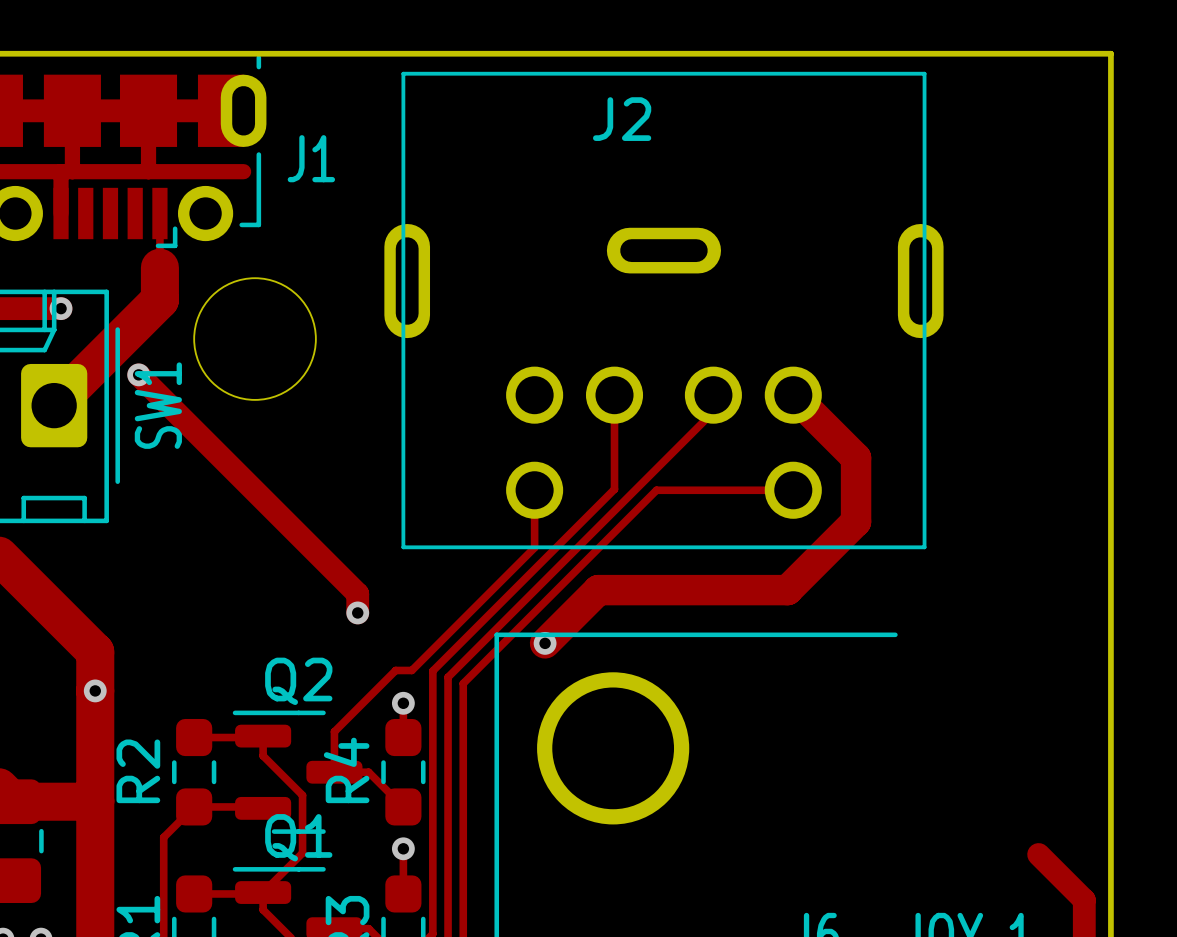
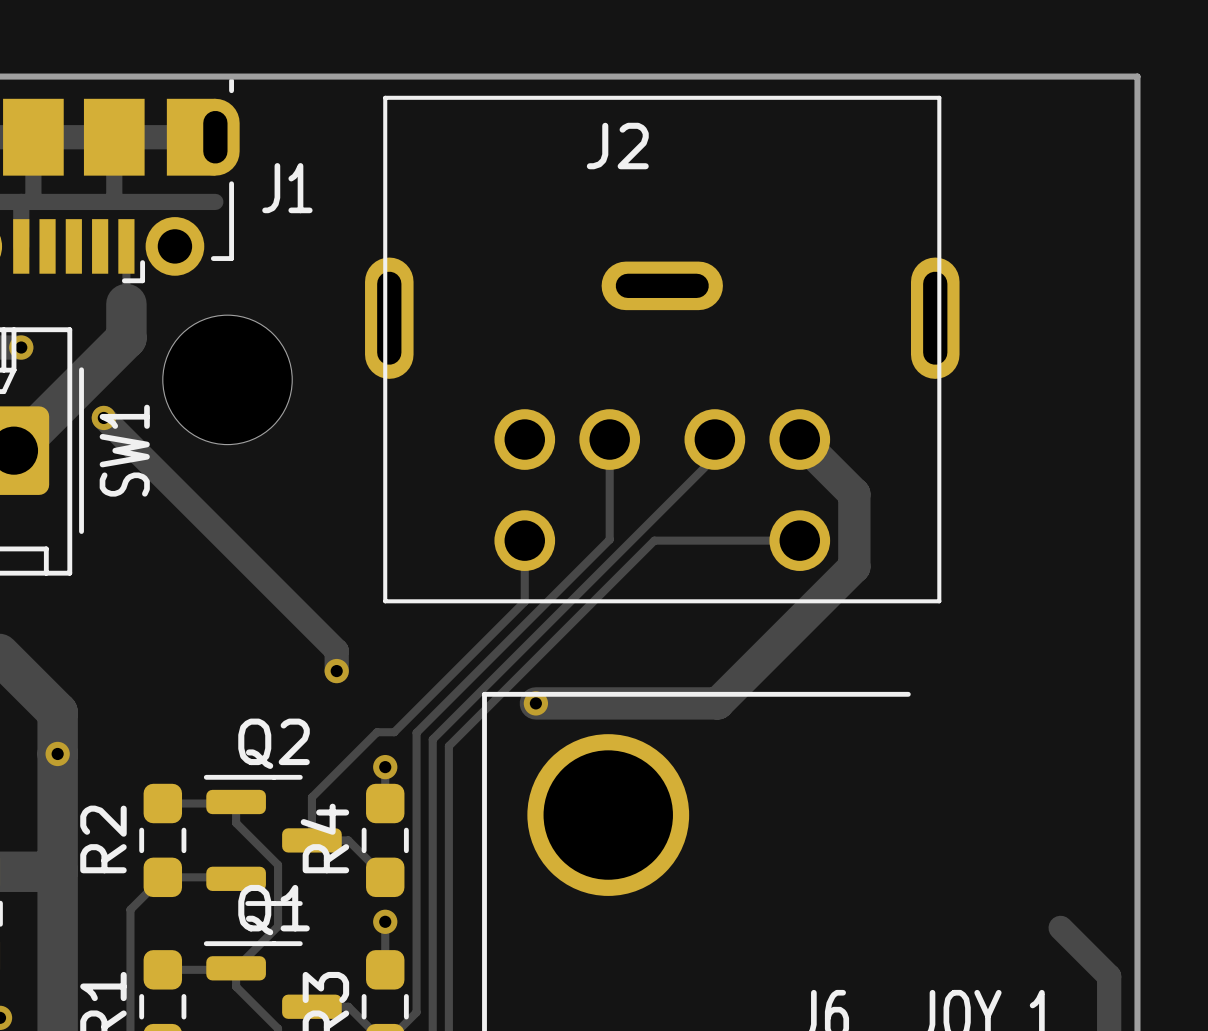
track: (844, 446) (856, 457) (856, 521) (787, 590) (598, 590) (545, 643) -> (854, 494) (854, 566) (717, 703) (535, 703)

